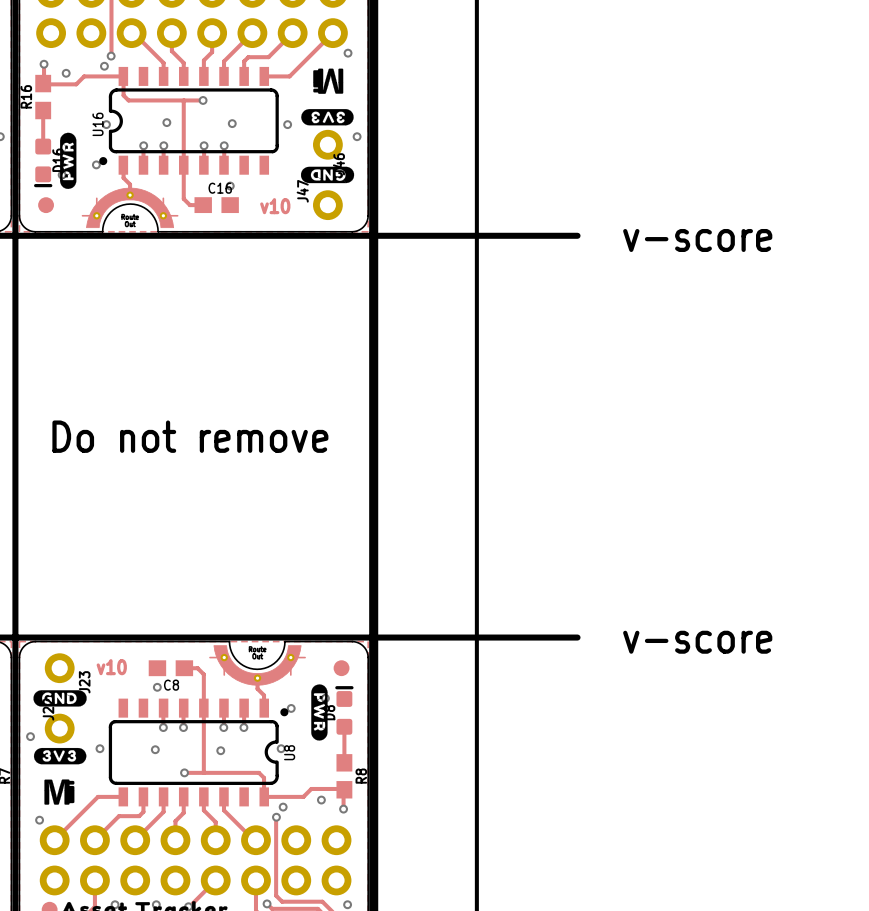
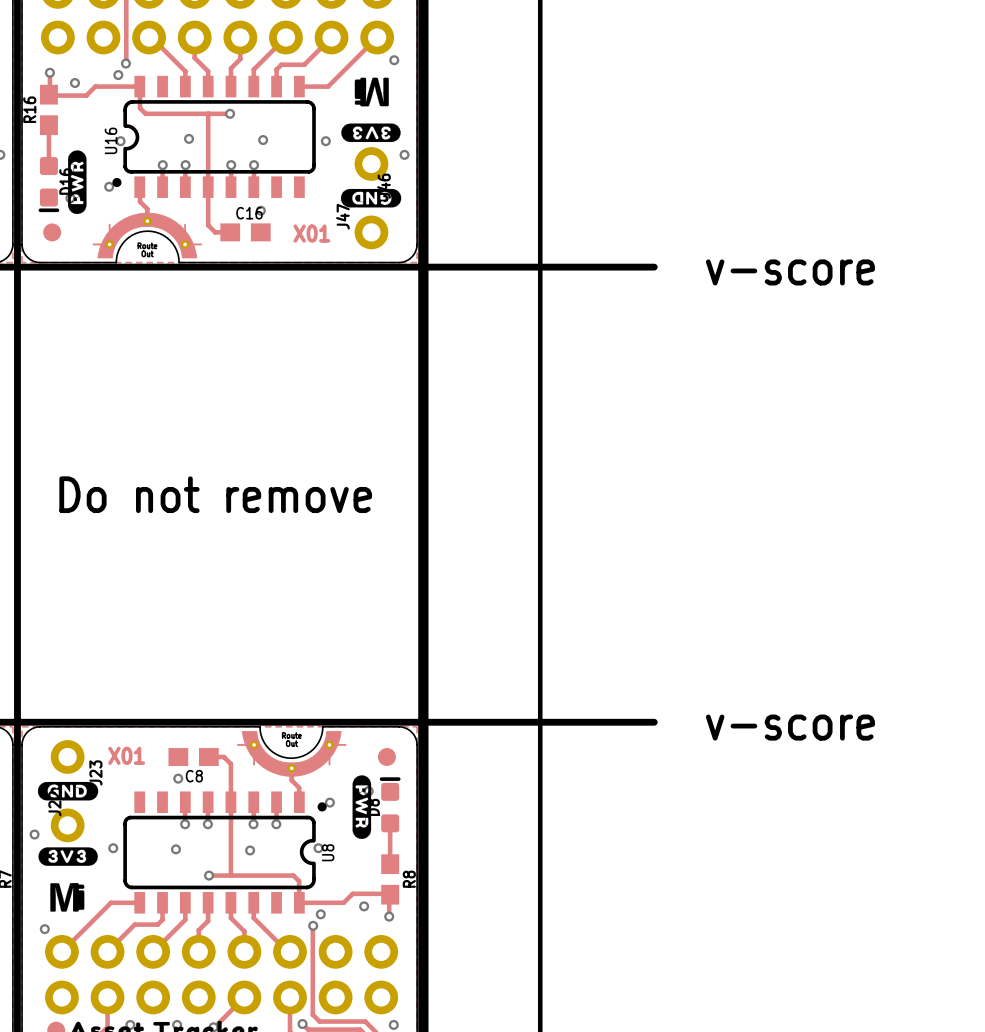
text: v10 (275, 206) -> X01 (311, 233)
text: v10 (111, 667) -> X01 (126, 755)

